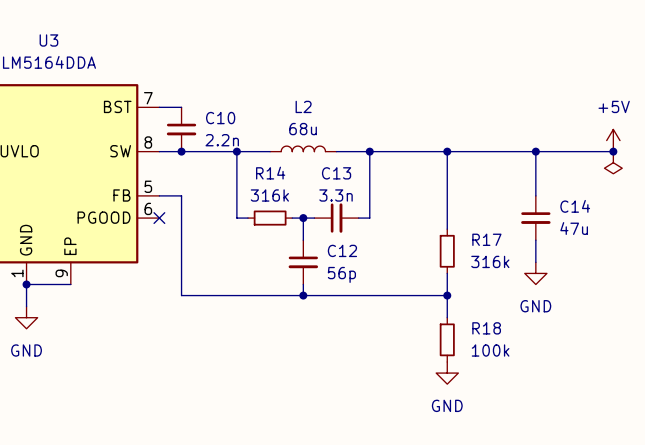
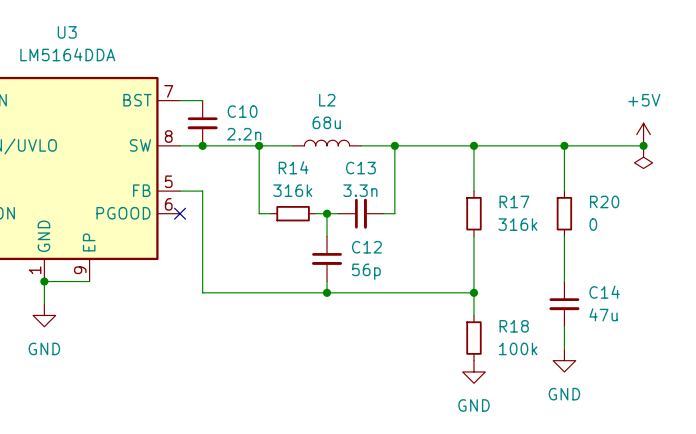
wire: (447, 195) (447, 229) -> (473, 236) (473, 270)
C14 position: (535, 218) -> (564, 304)
R20: none -> 0 (564, 213)
R17 position: (447, 251) -> (473, 213)
power symbol position: GND (535, 273) -> GND (564, 360)
wire: none -> (564, 326) (564, 349)

